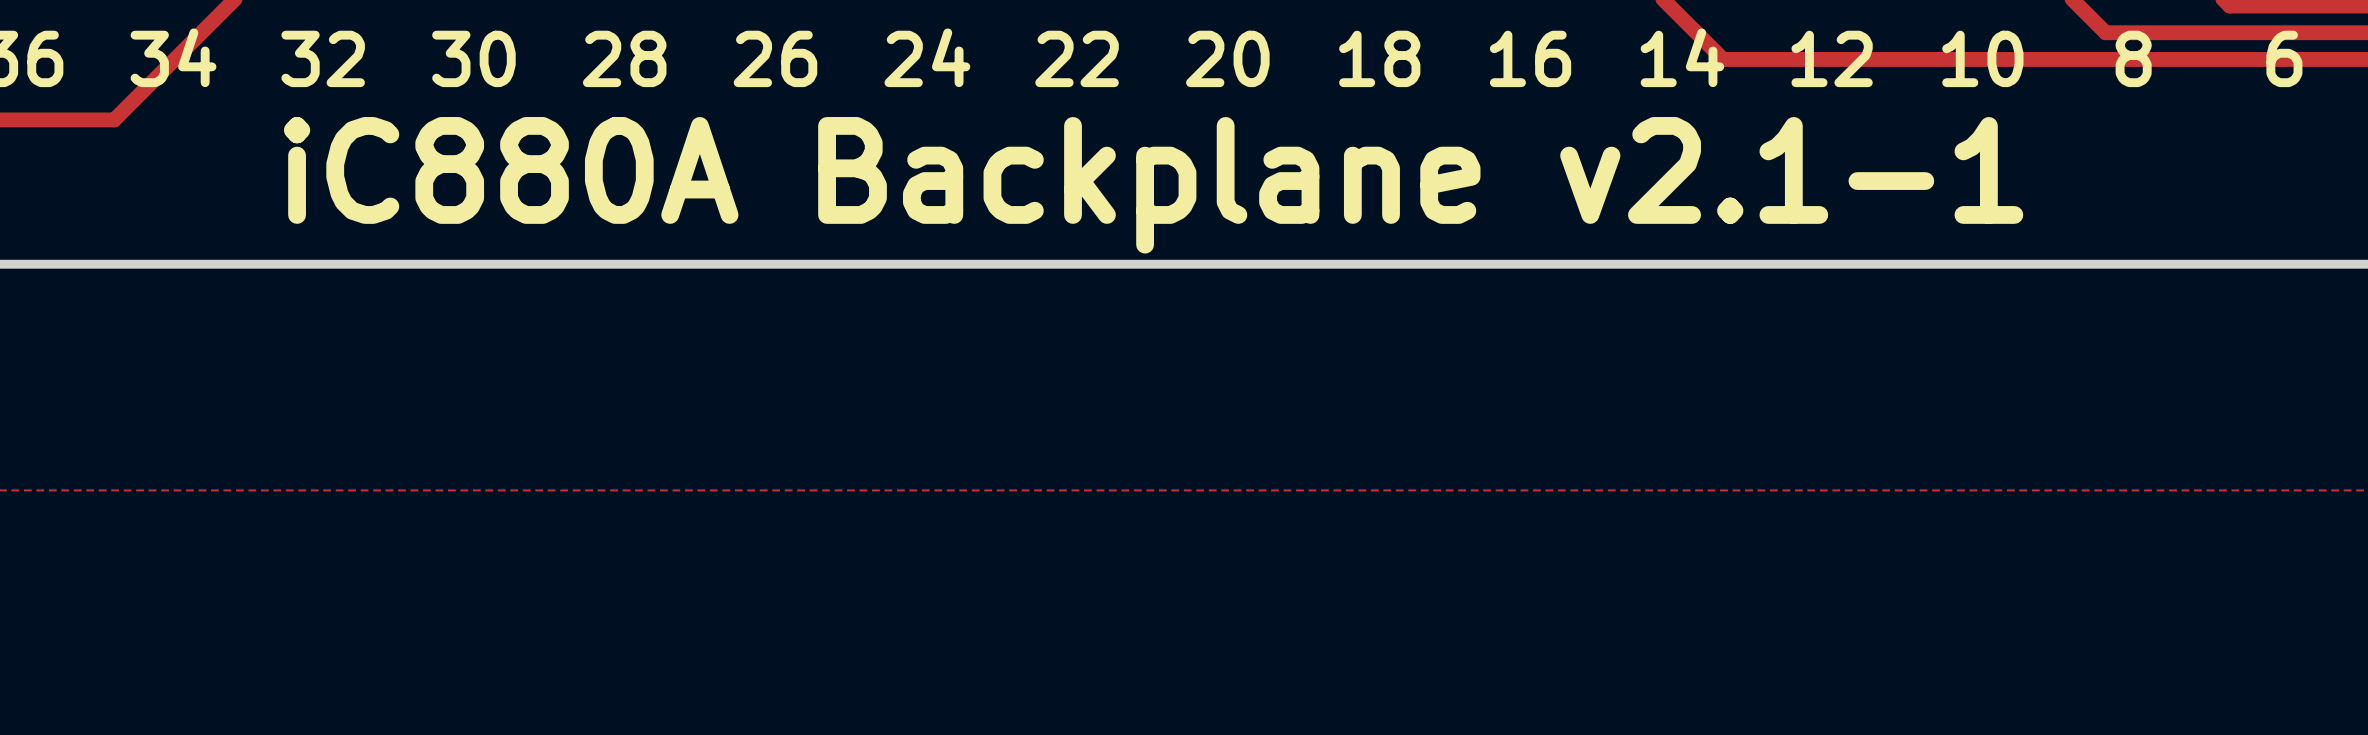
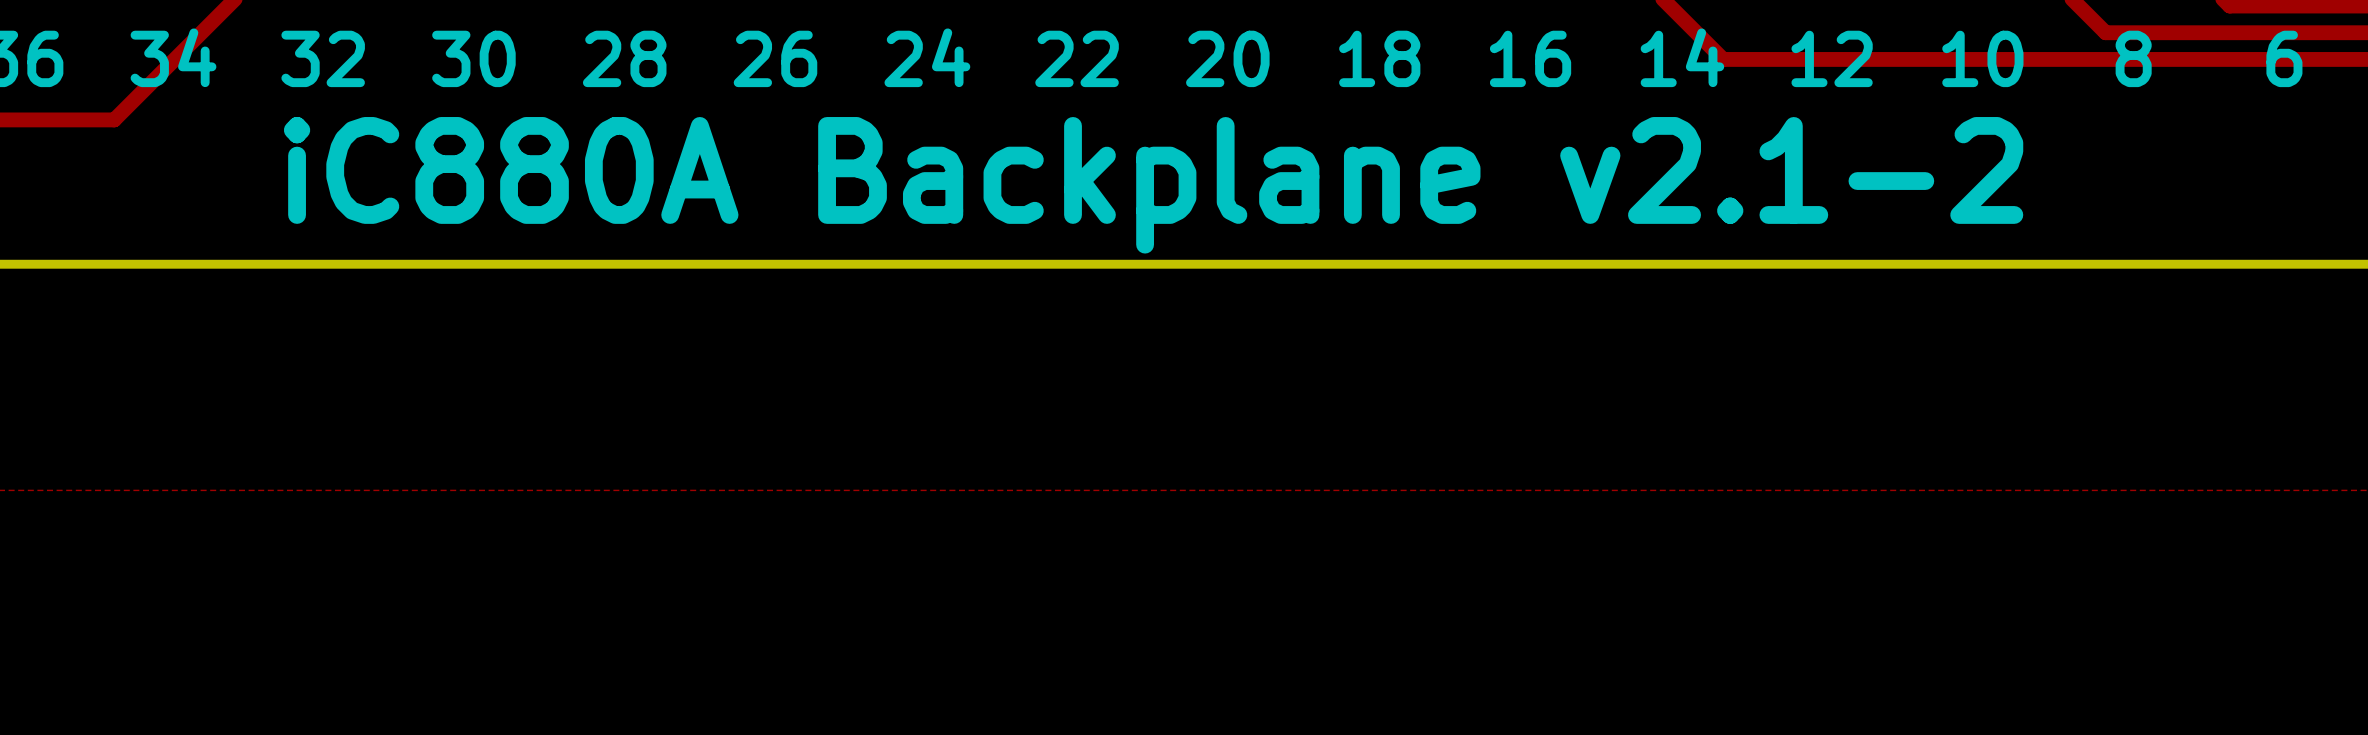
text: iC880A Backplane v2.1-1 (1153, 185) -> iC880A Backplane v2.1-2 (1153, 185)

